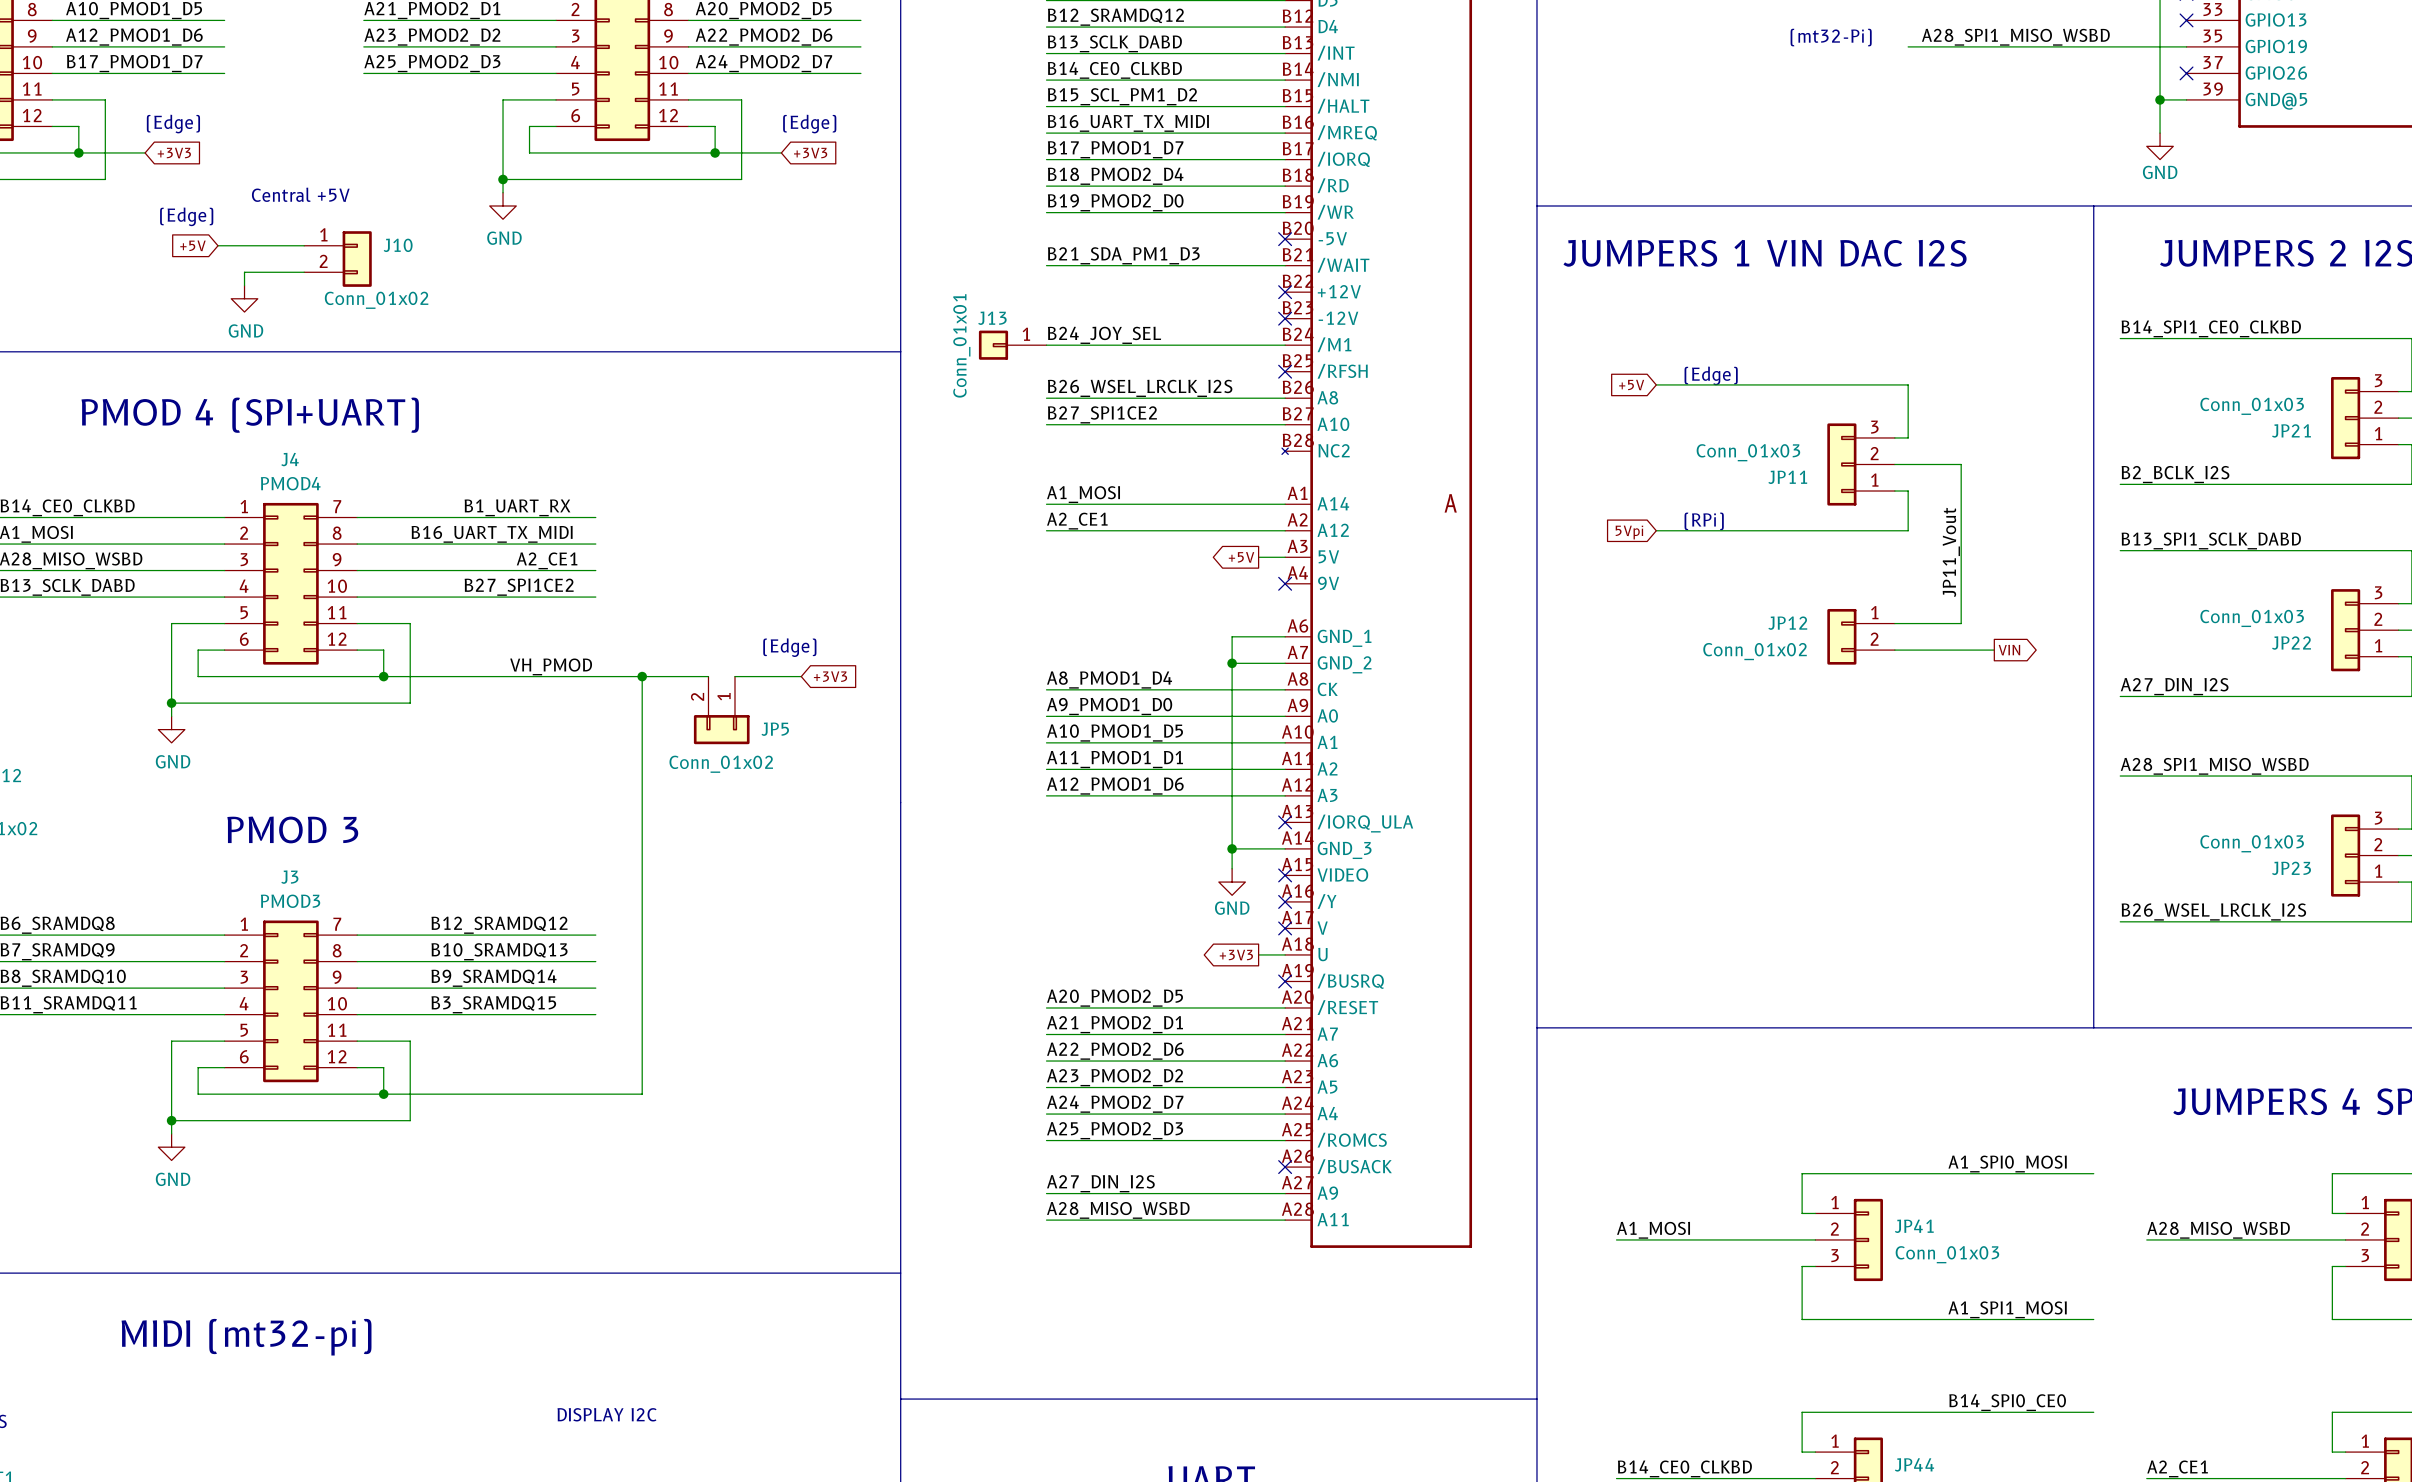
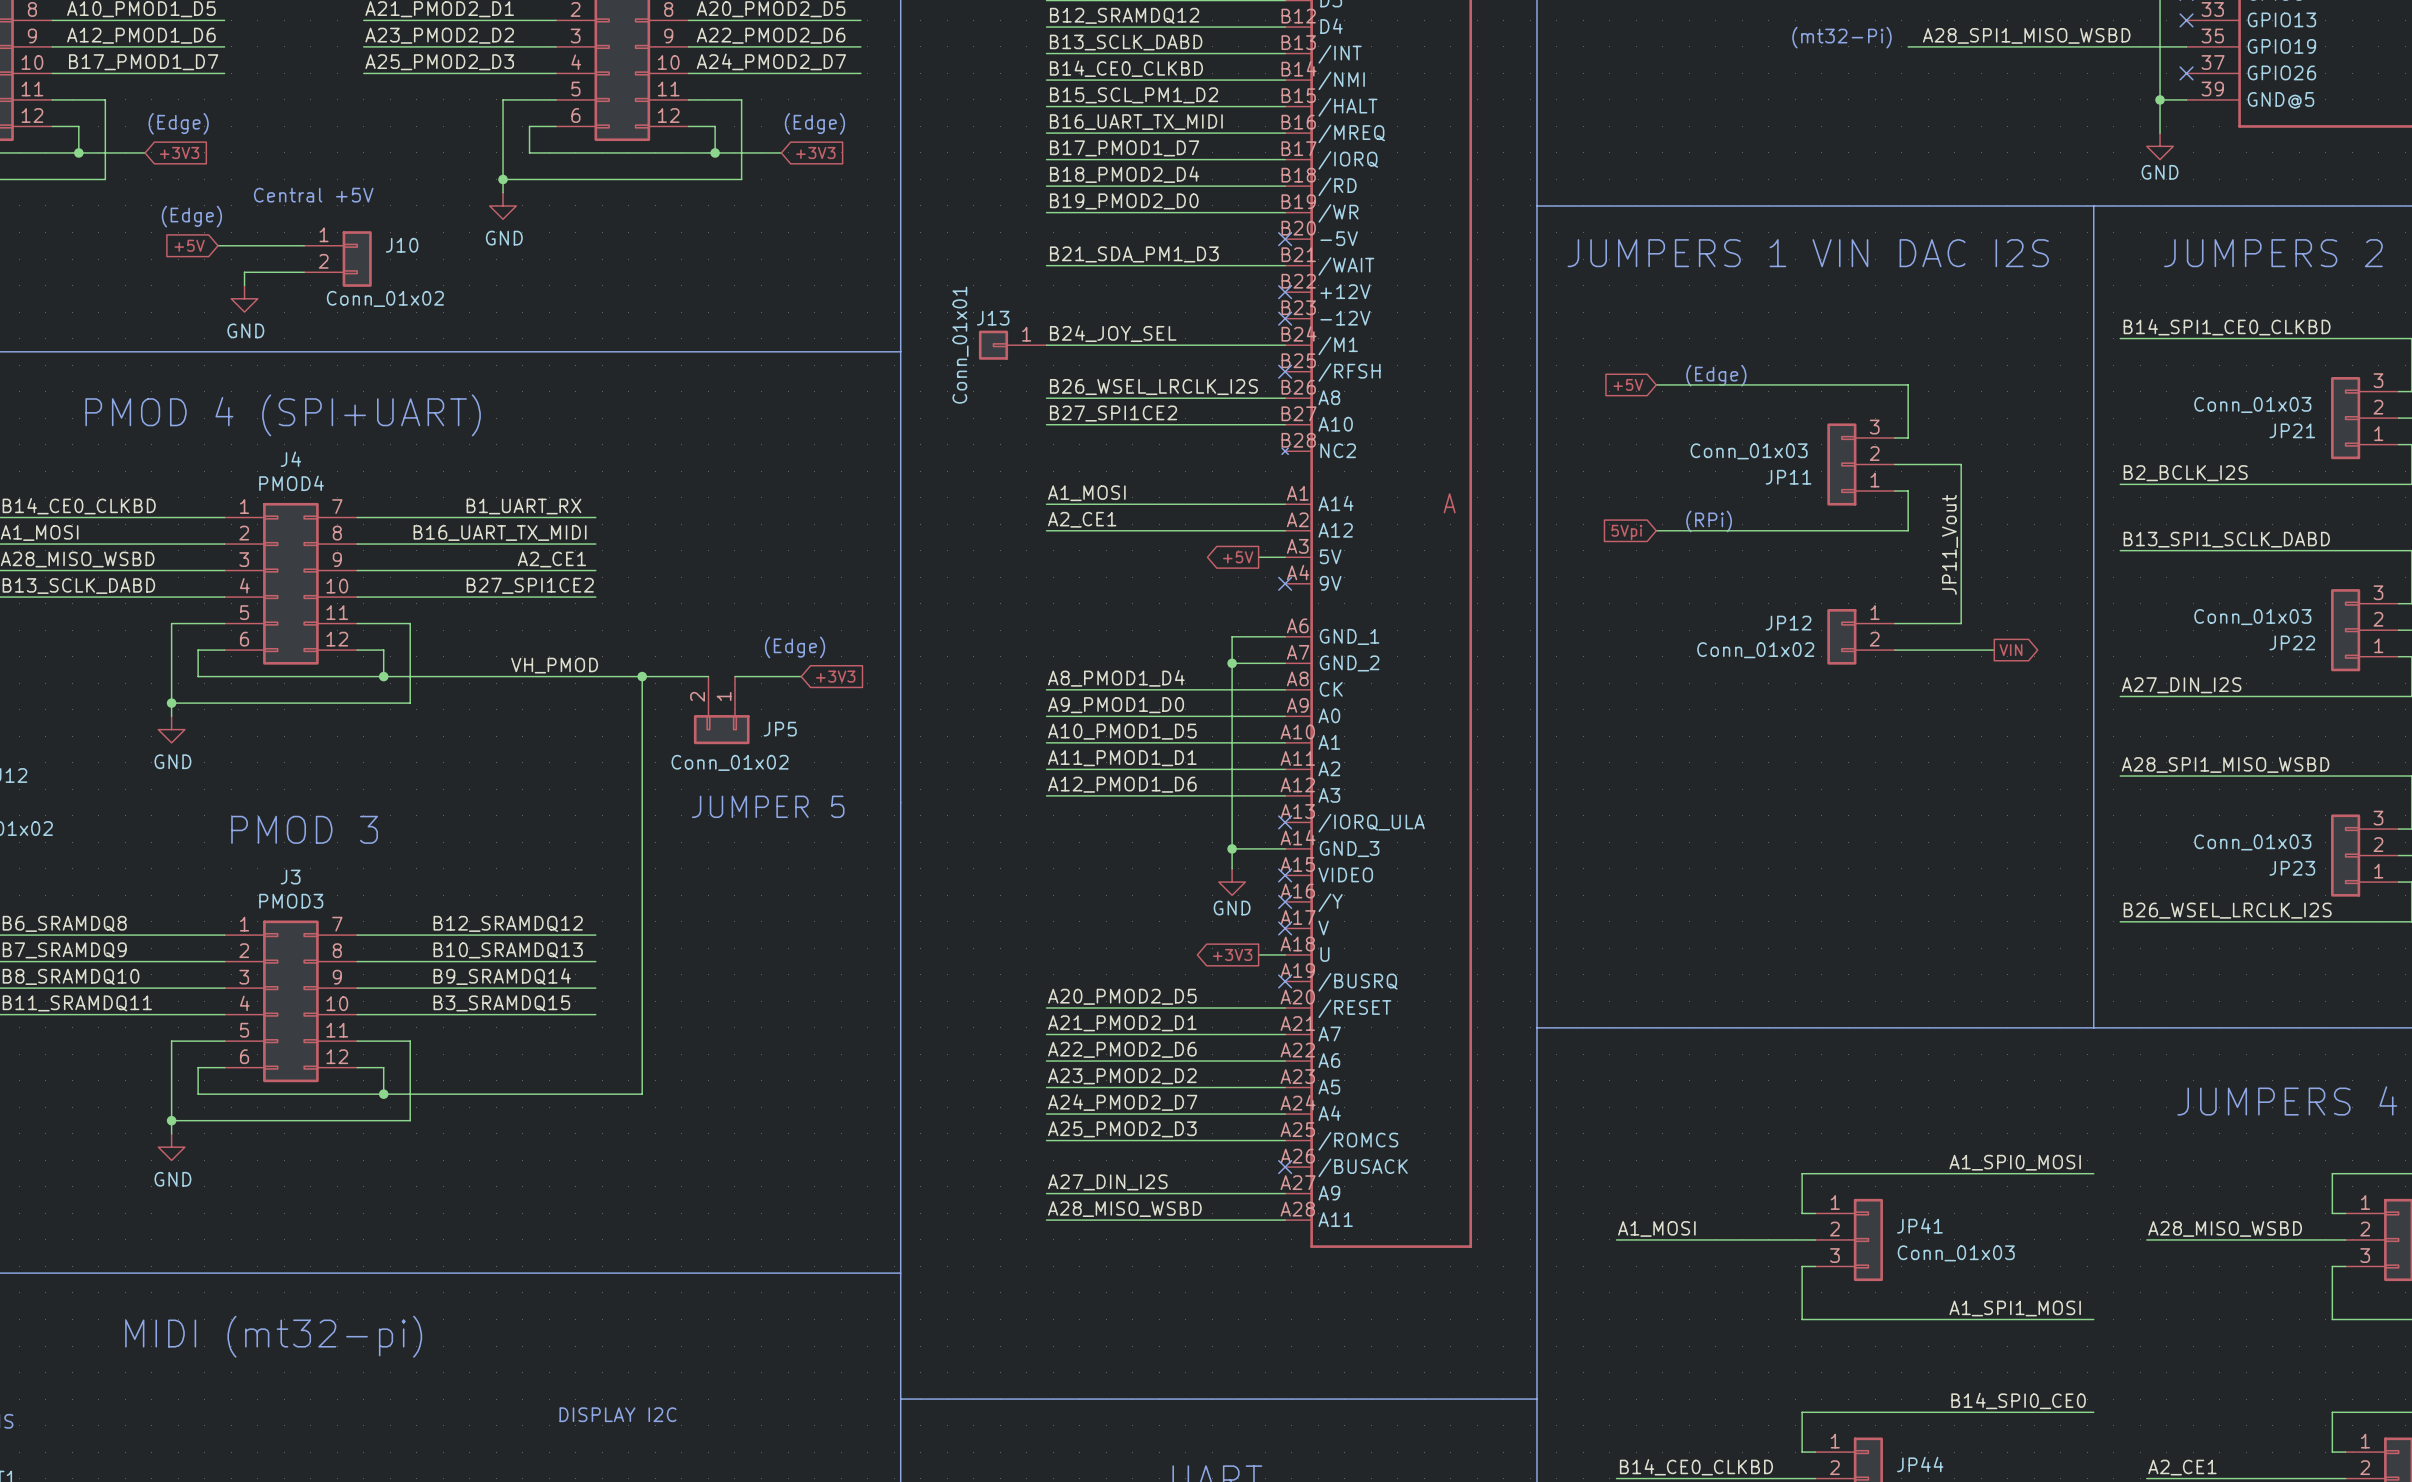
text: none -> JUMPER 5 (768, 806)

